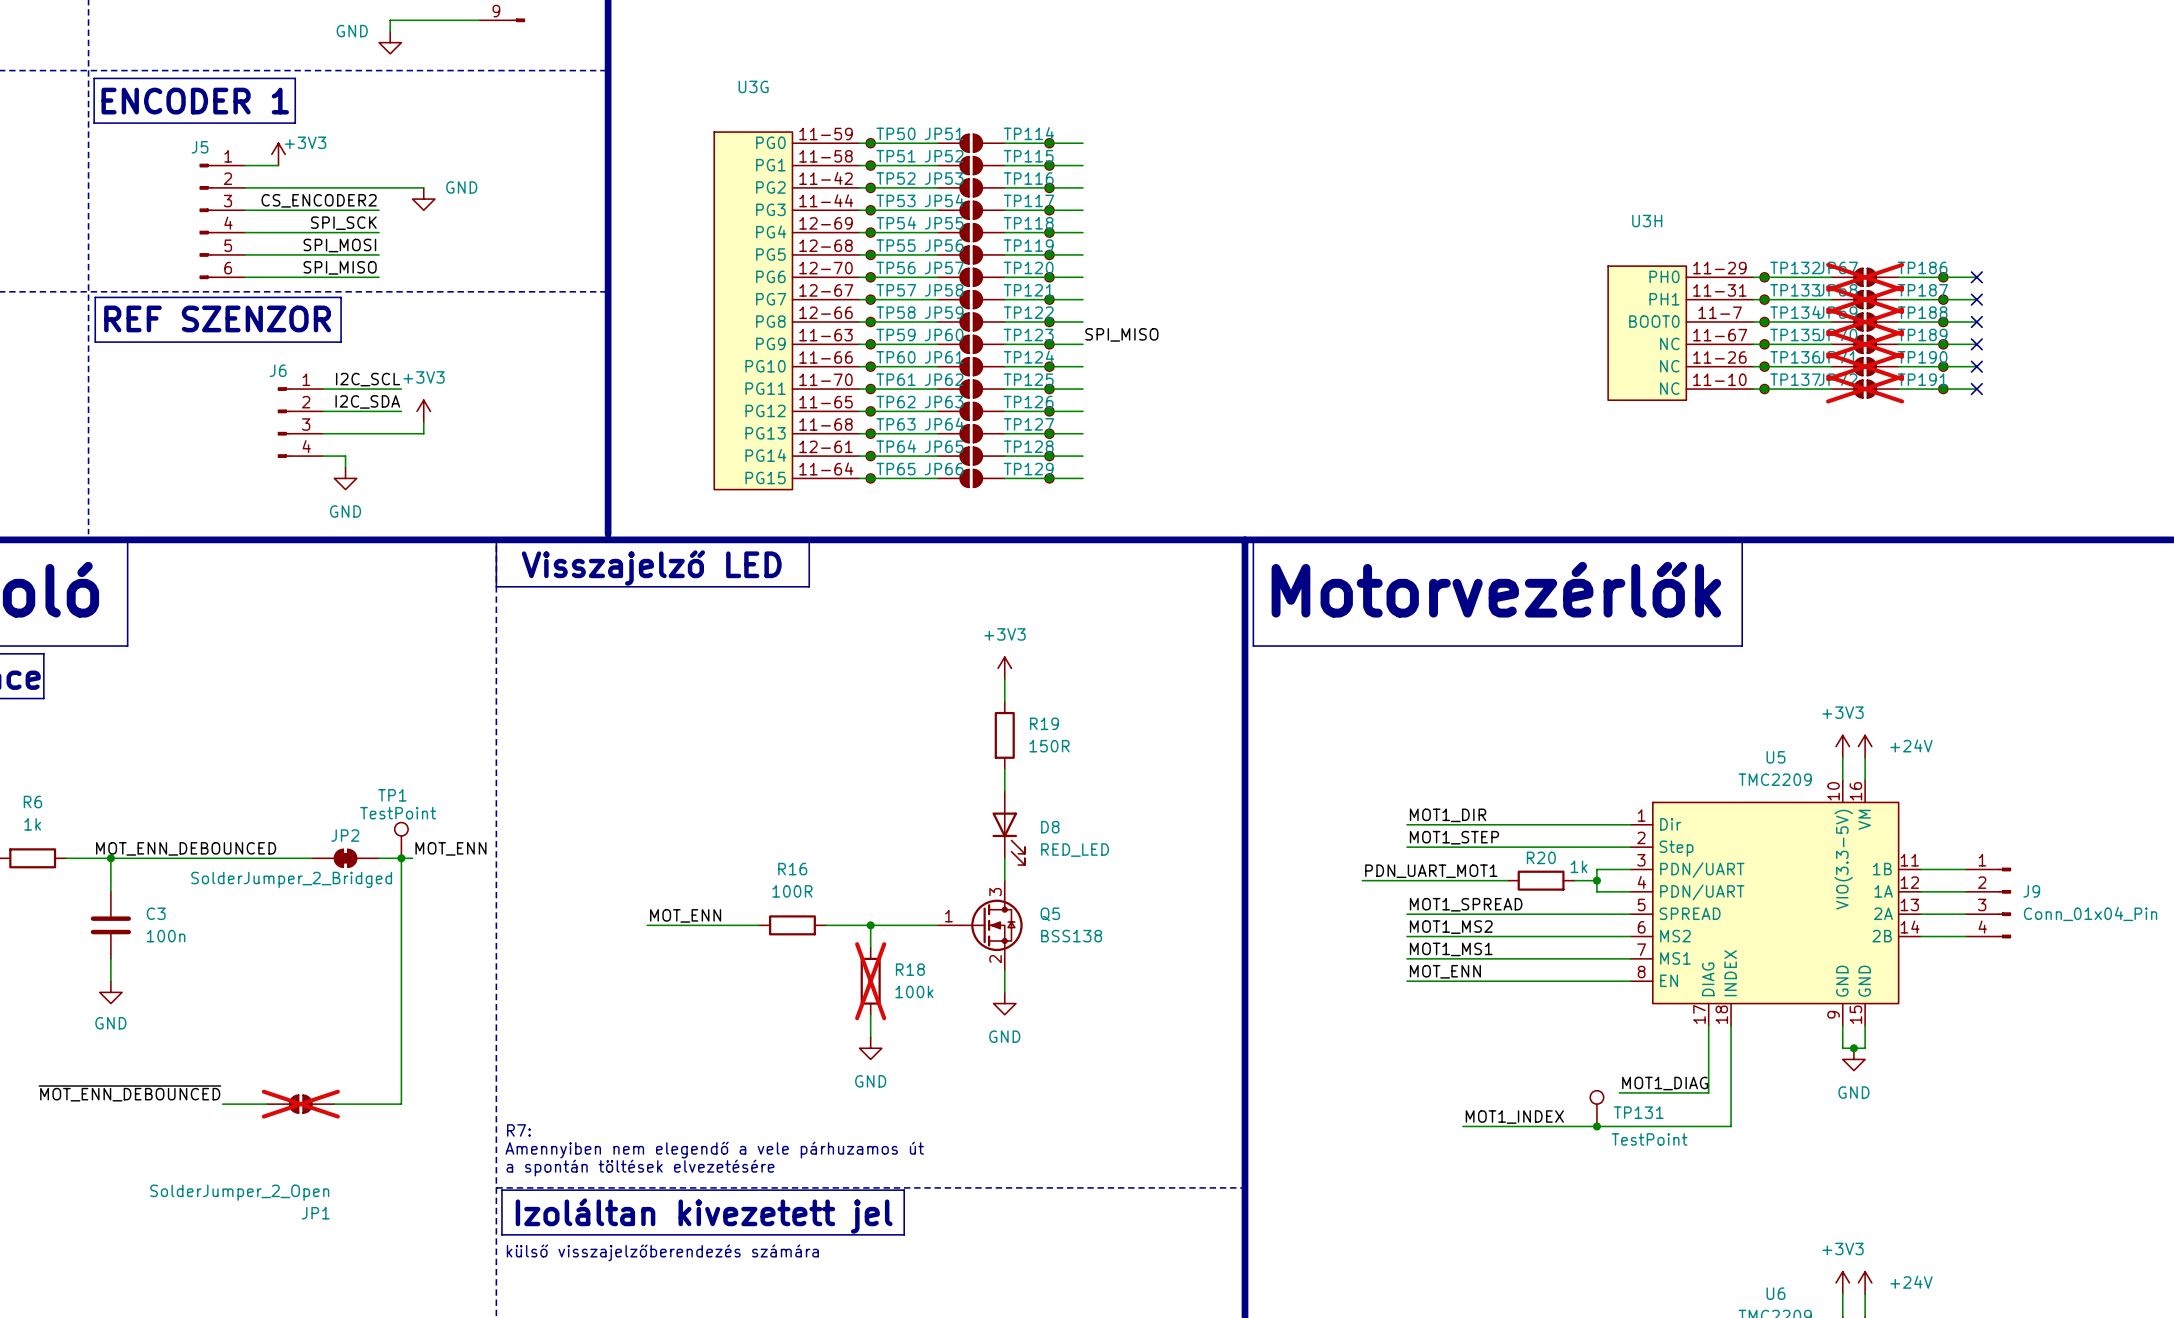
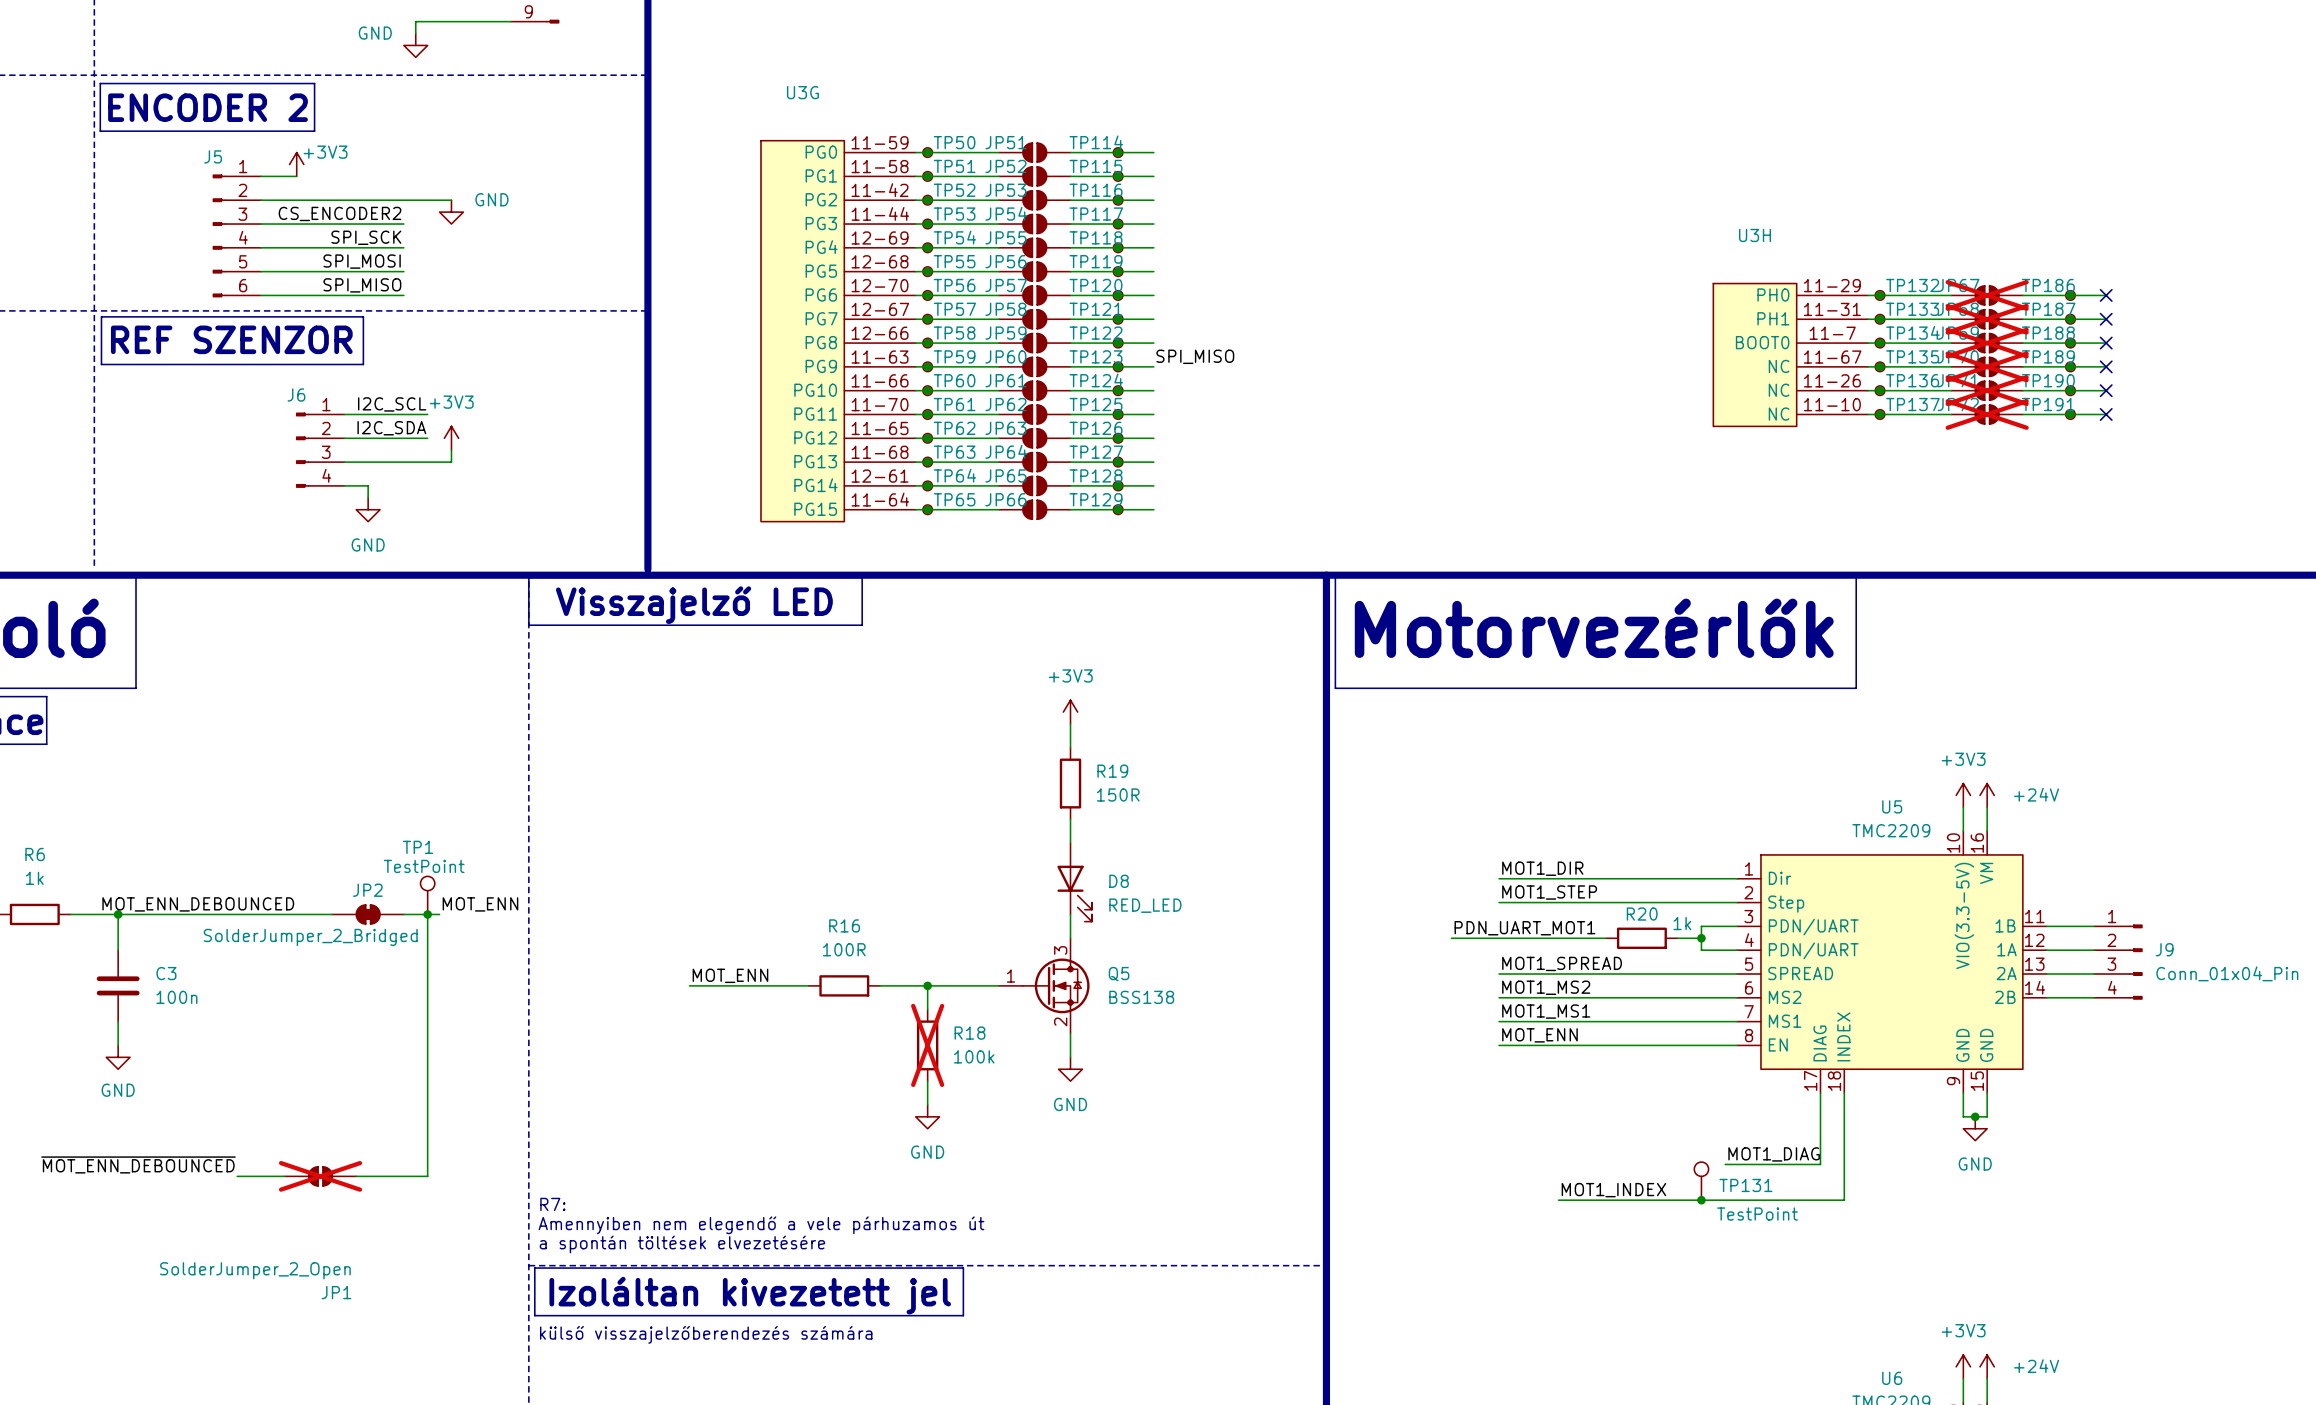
text: ENCODER 1 (195, 101) -> ENCODER 2 (208, 107)

